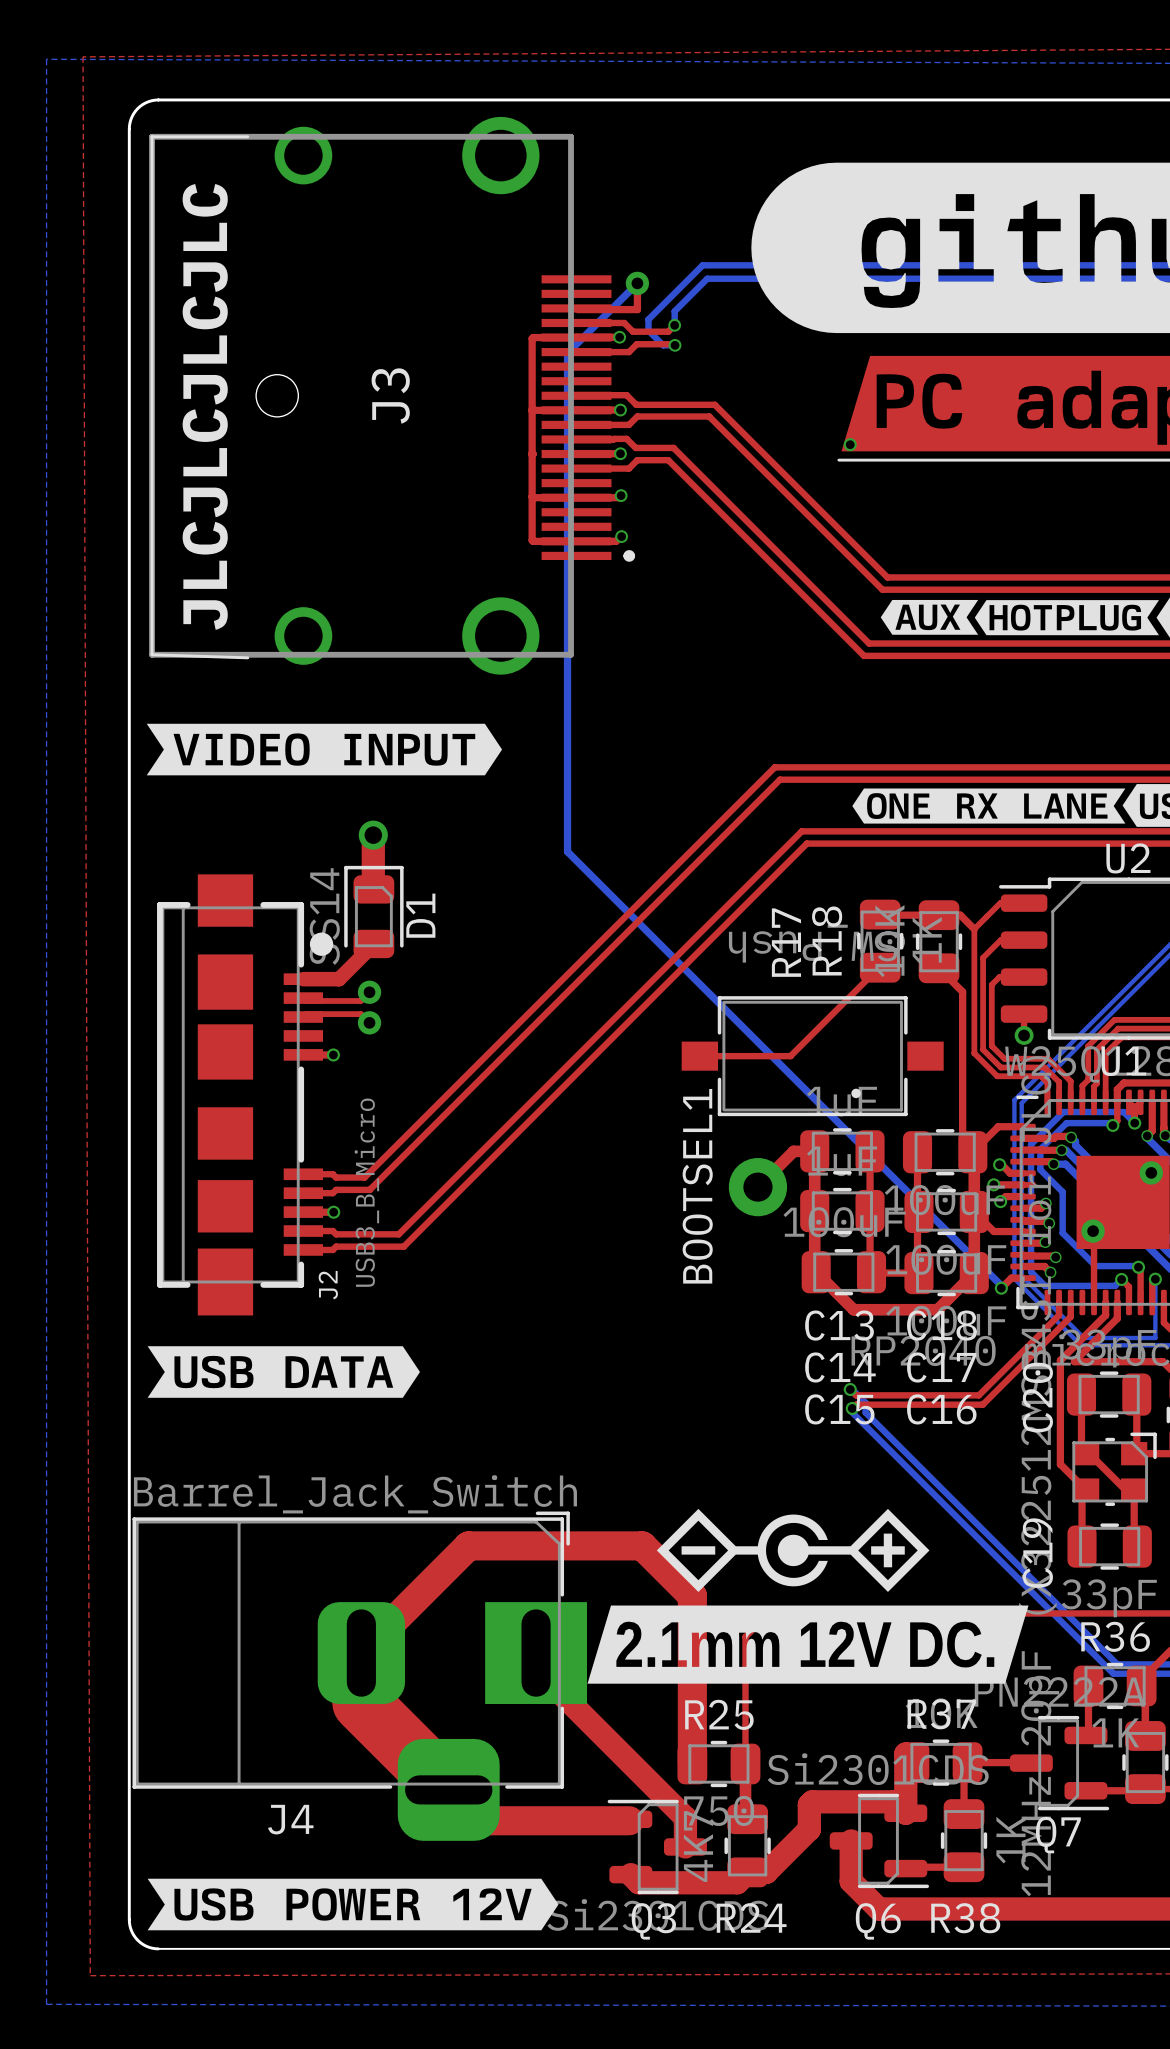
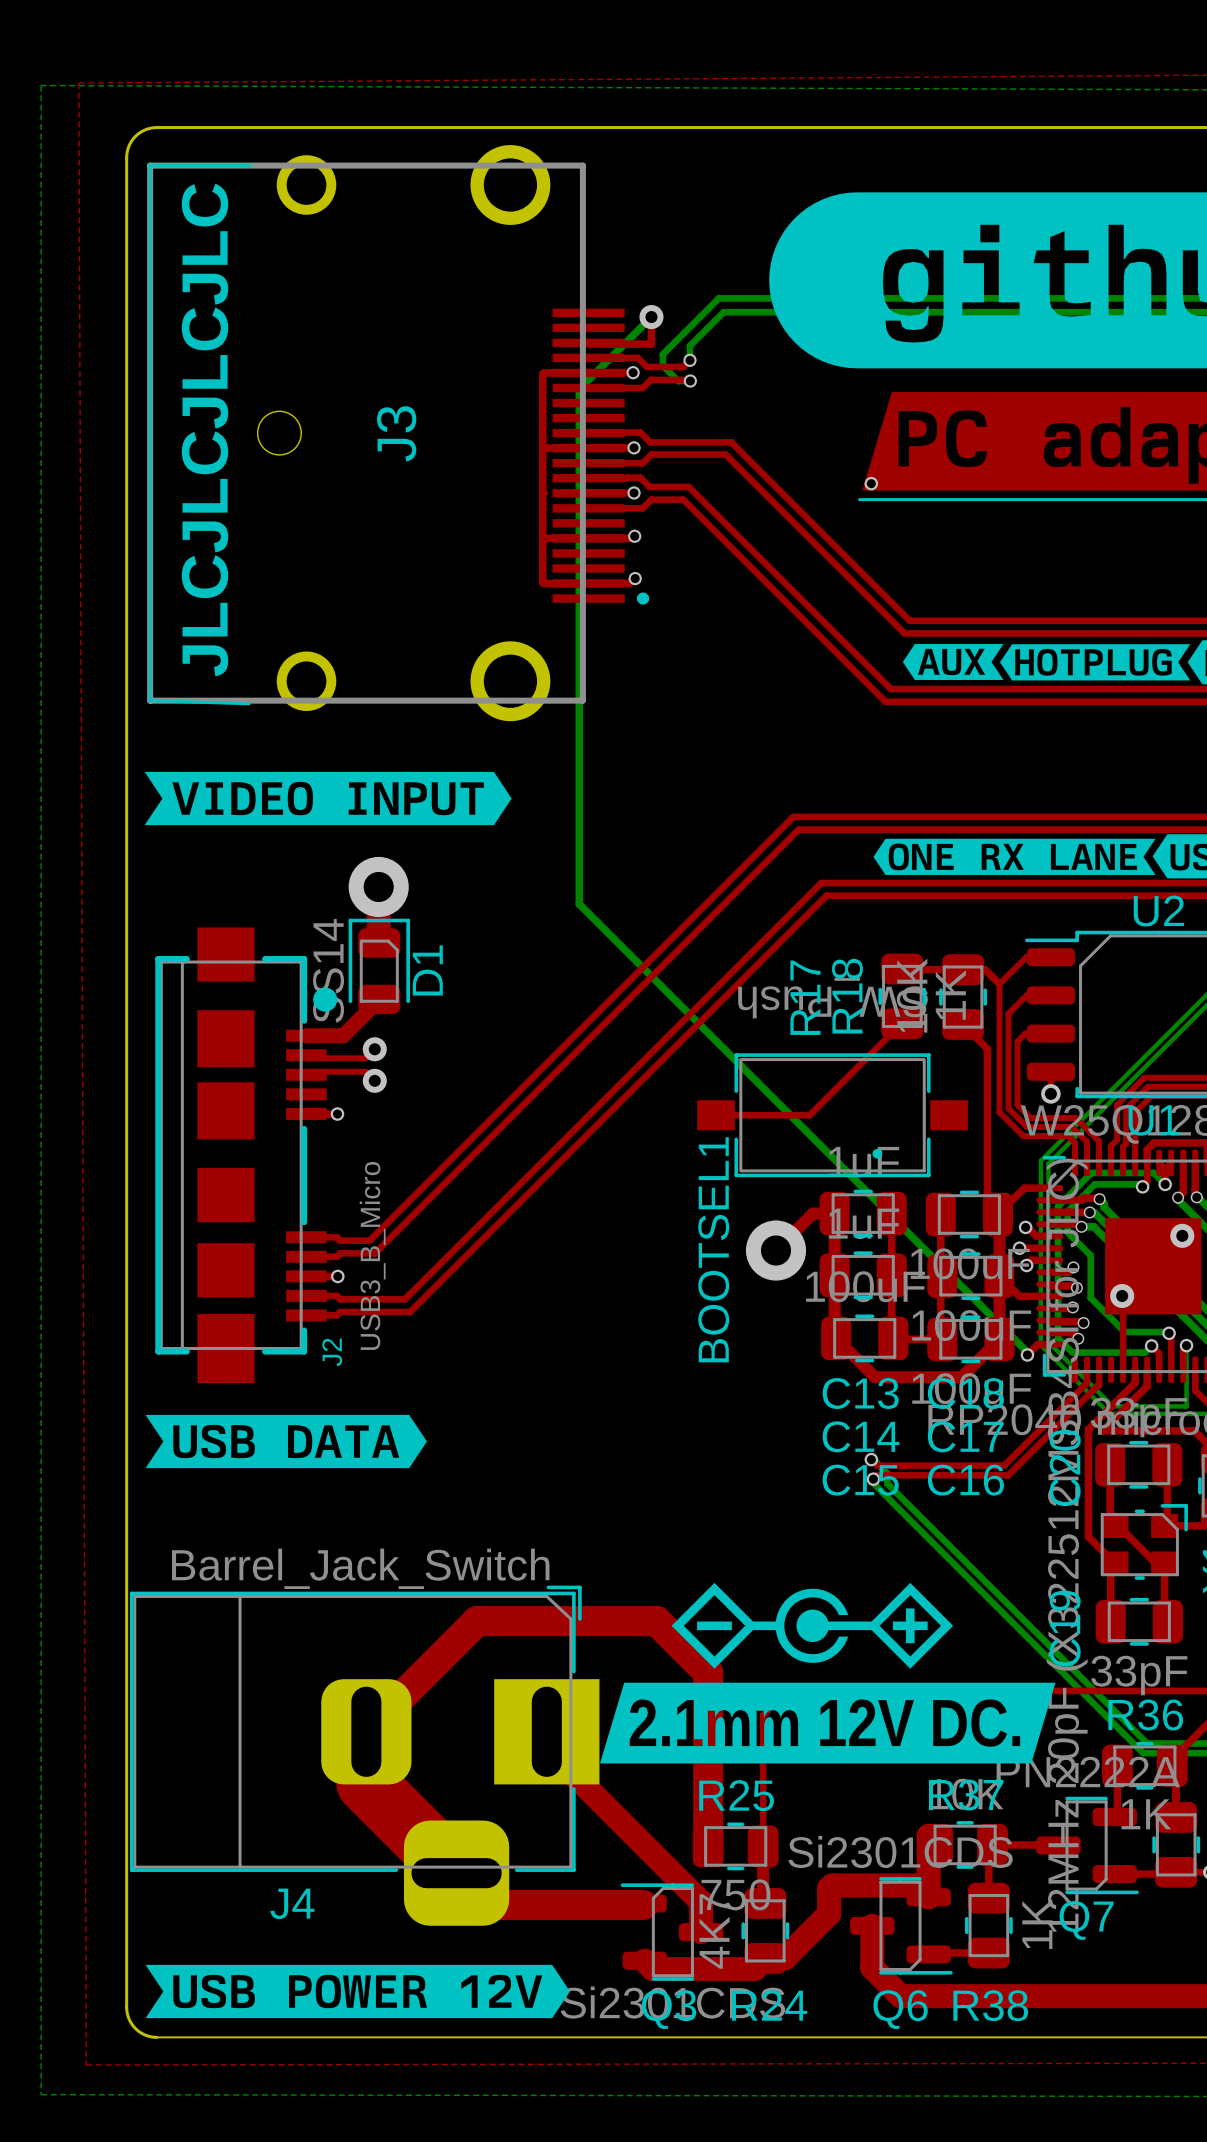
via size: [358, 820, 388, 850] -> [348, 856, 409, 918]

